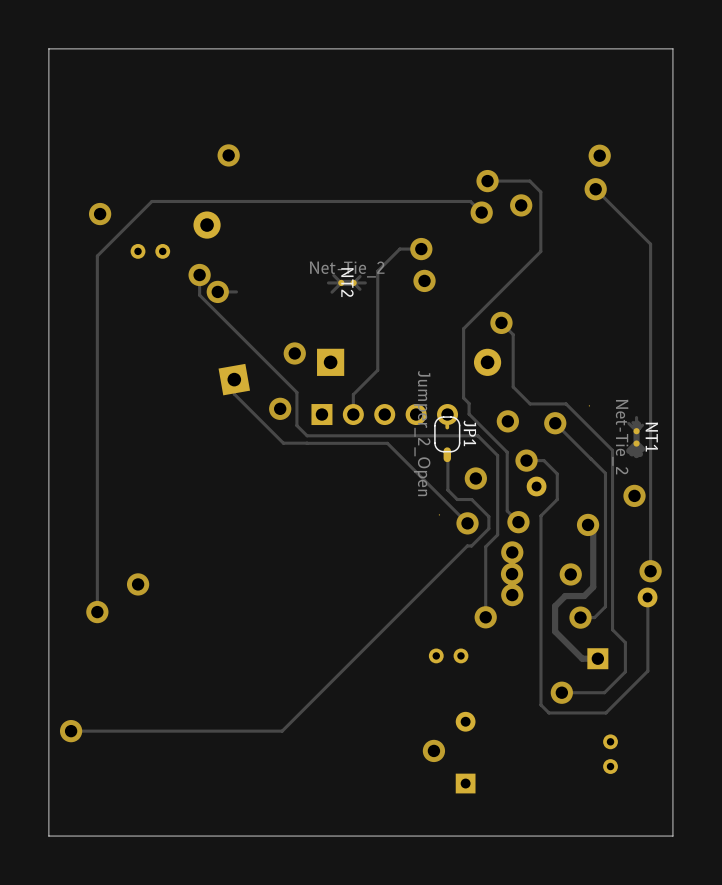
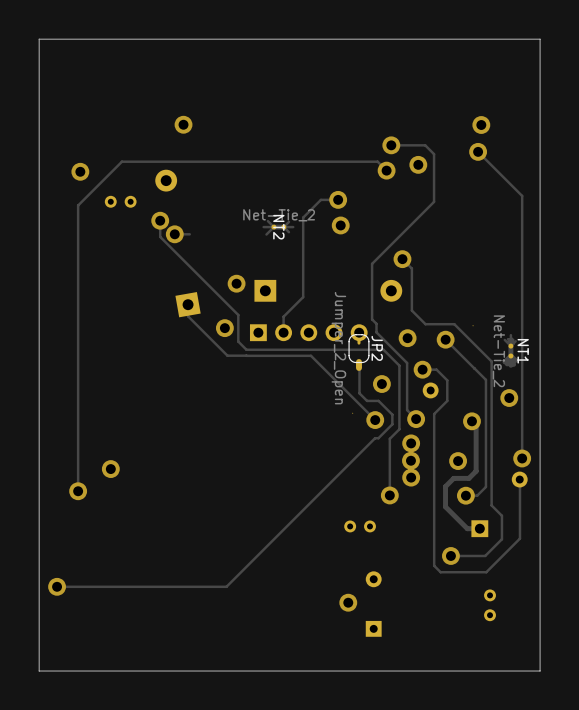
JP1 name: JP1 (469, 433) -> JP2 (377, 348)

